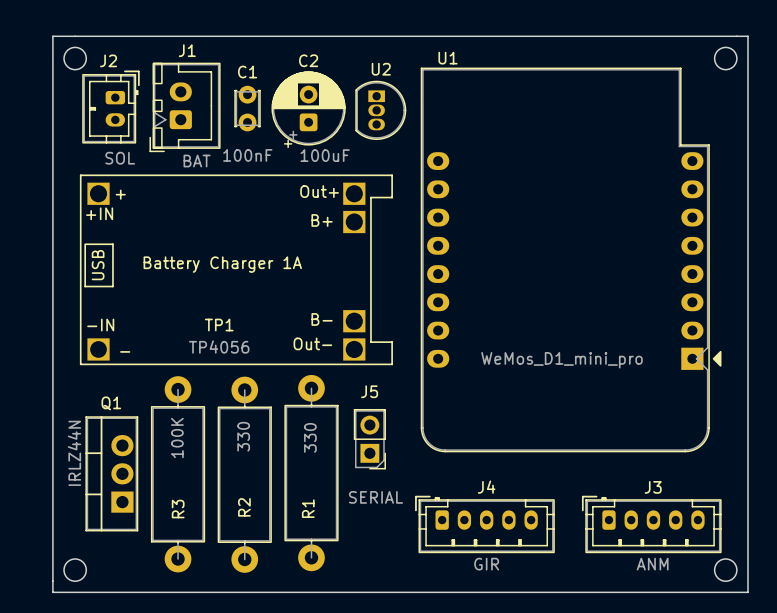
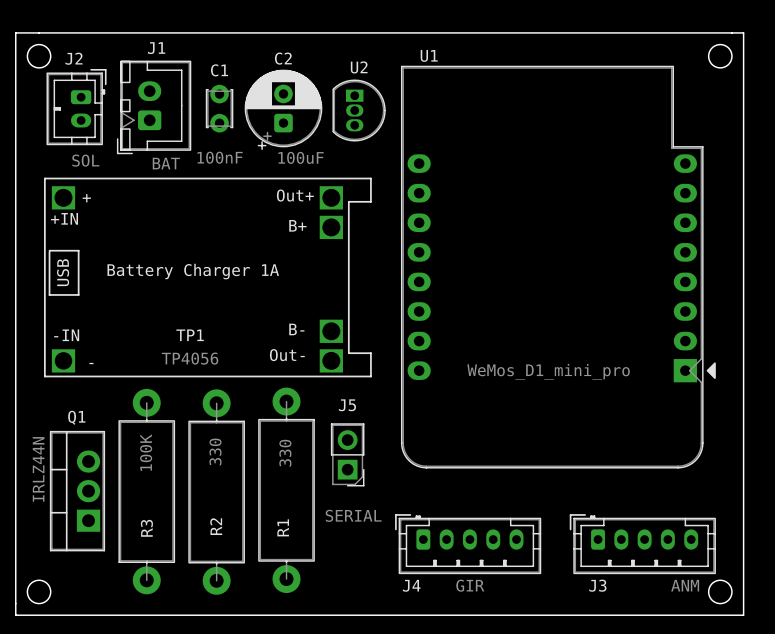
J4 name position: J4 (486, 487) -> J4 (411, 585)
J3 name position: J3 (653, 487) -> J3 (597, 585)
J3 value position: ANM (652, 564) -> ANM (685, 585)

